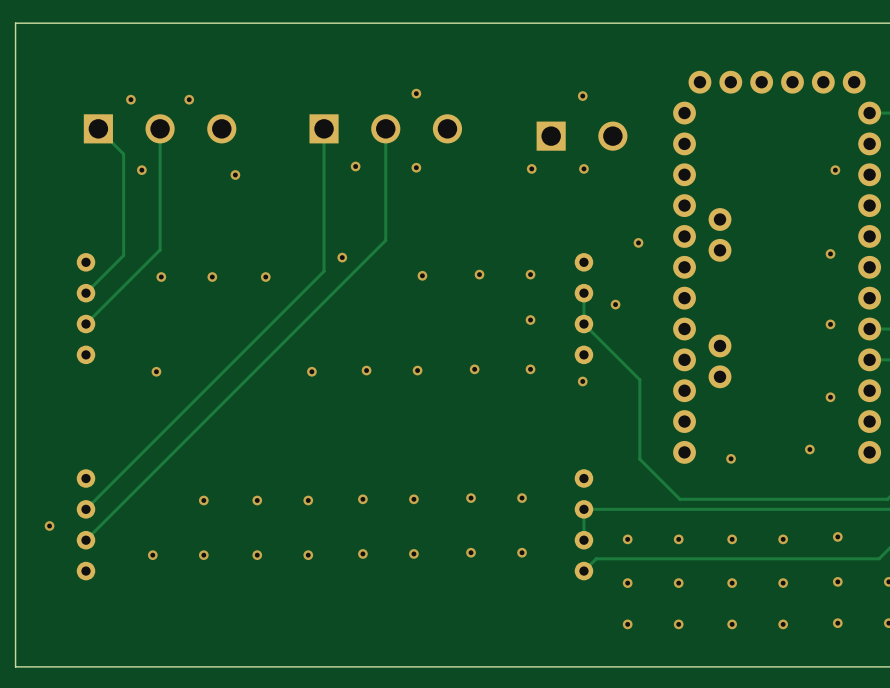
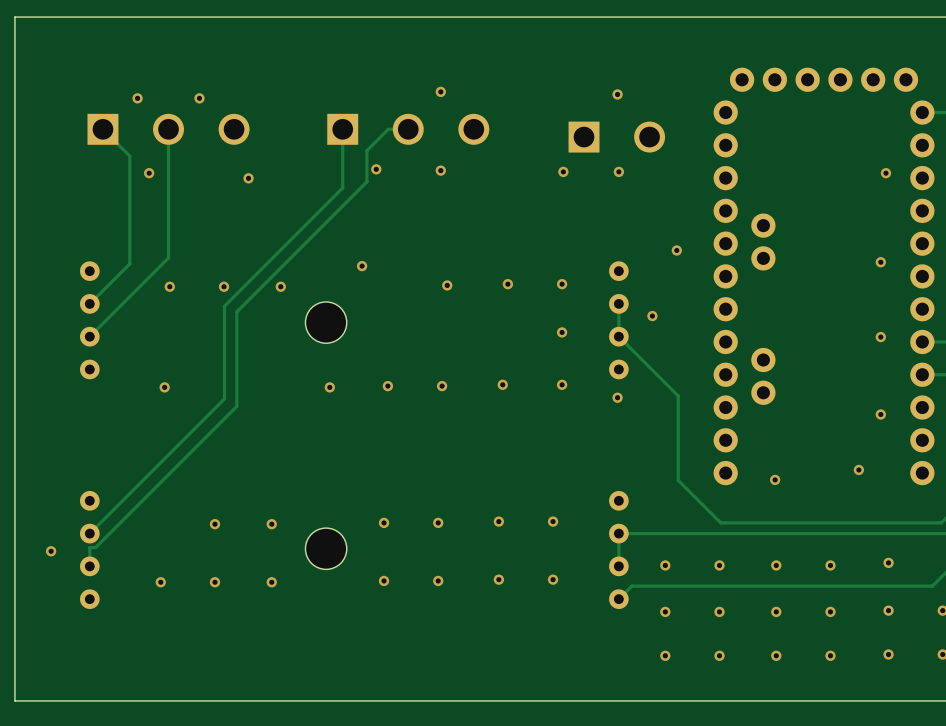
track: (385, 128) (385, 240) (86, 540) -> (408, 129) (388, 129) (366, 150) (366, 181) (236, 311) (236, 406) (95, 547) (89, 547) (89, 566)
track: (324, 184) (324, 271) (212, 382) -> (342, 187) (224, 306) (224, 398)
part: none -> (326, 322)
via: (308, 500) -> none
part: none -> (326, 548)
via: (308, 555) -> none

